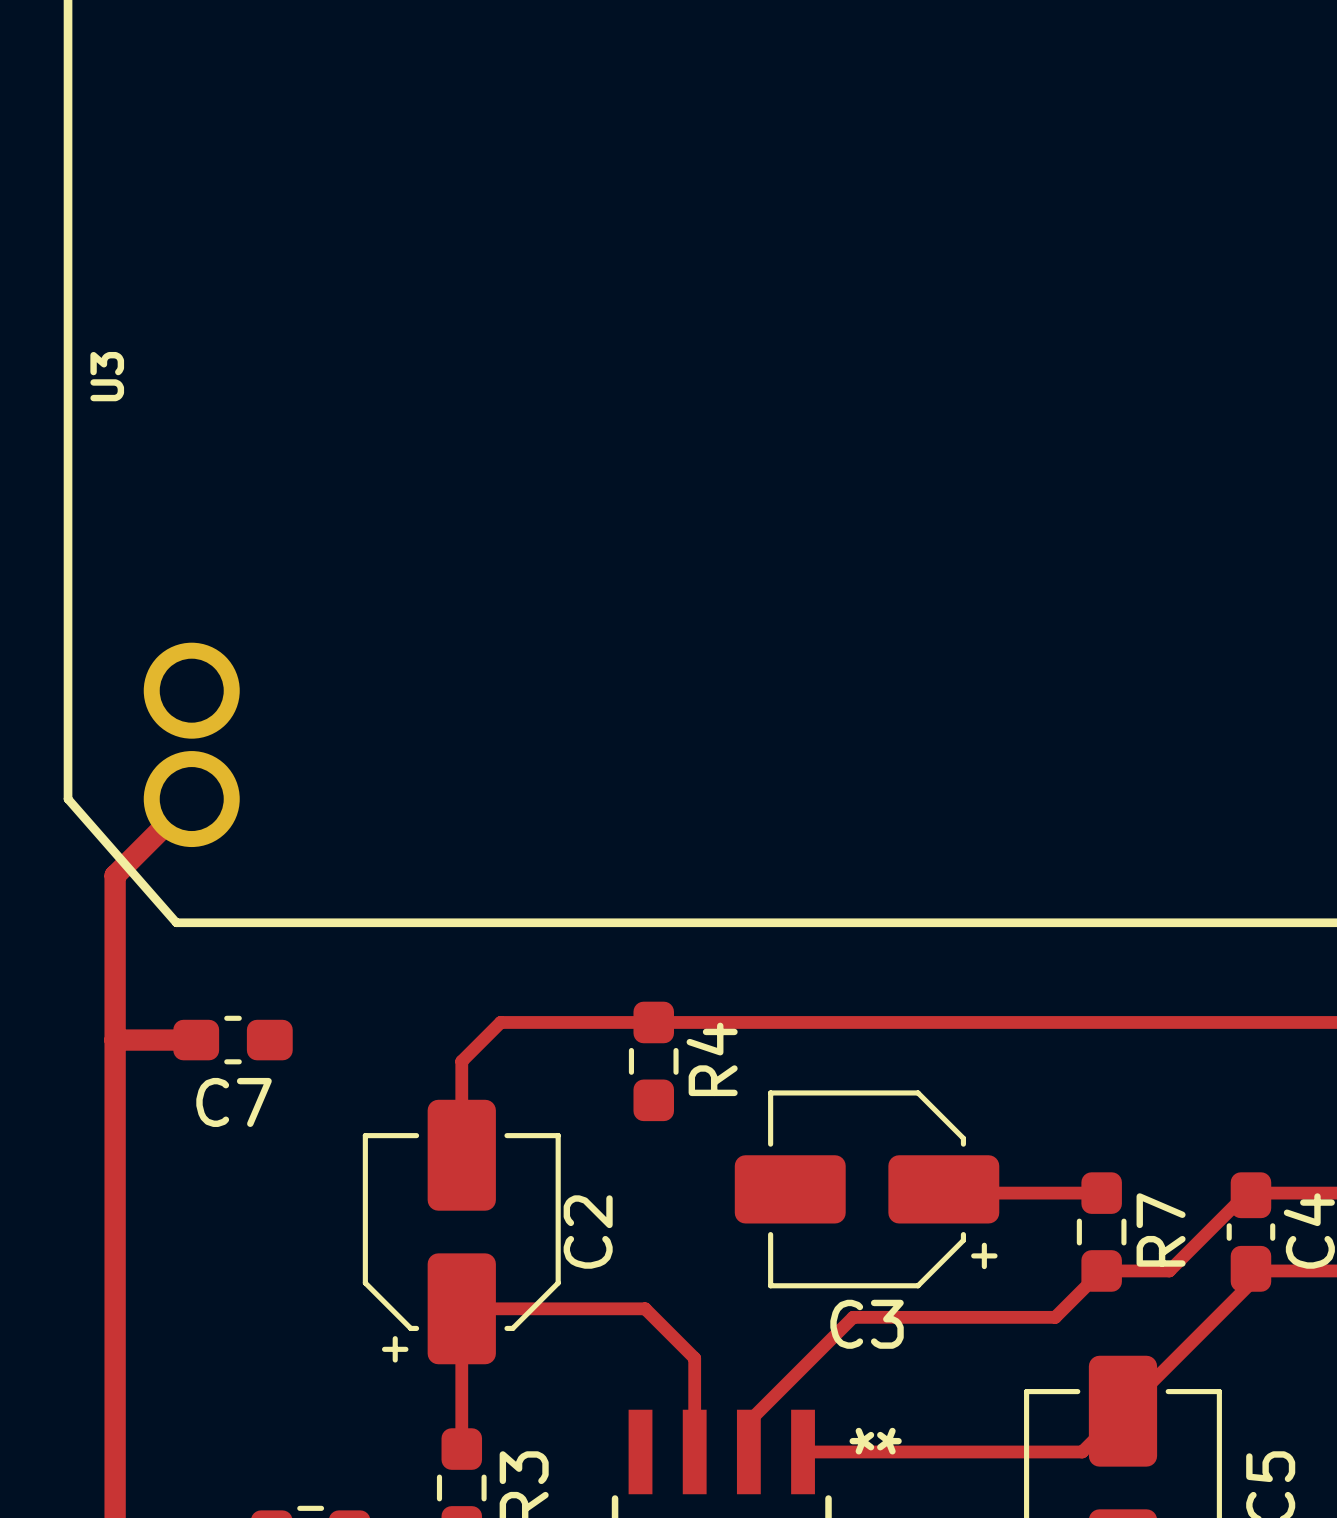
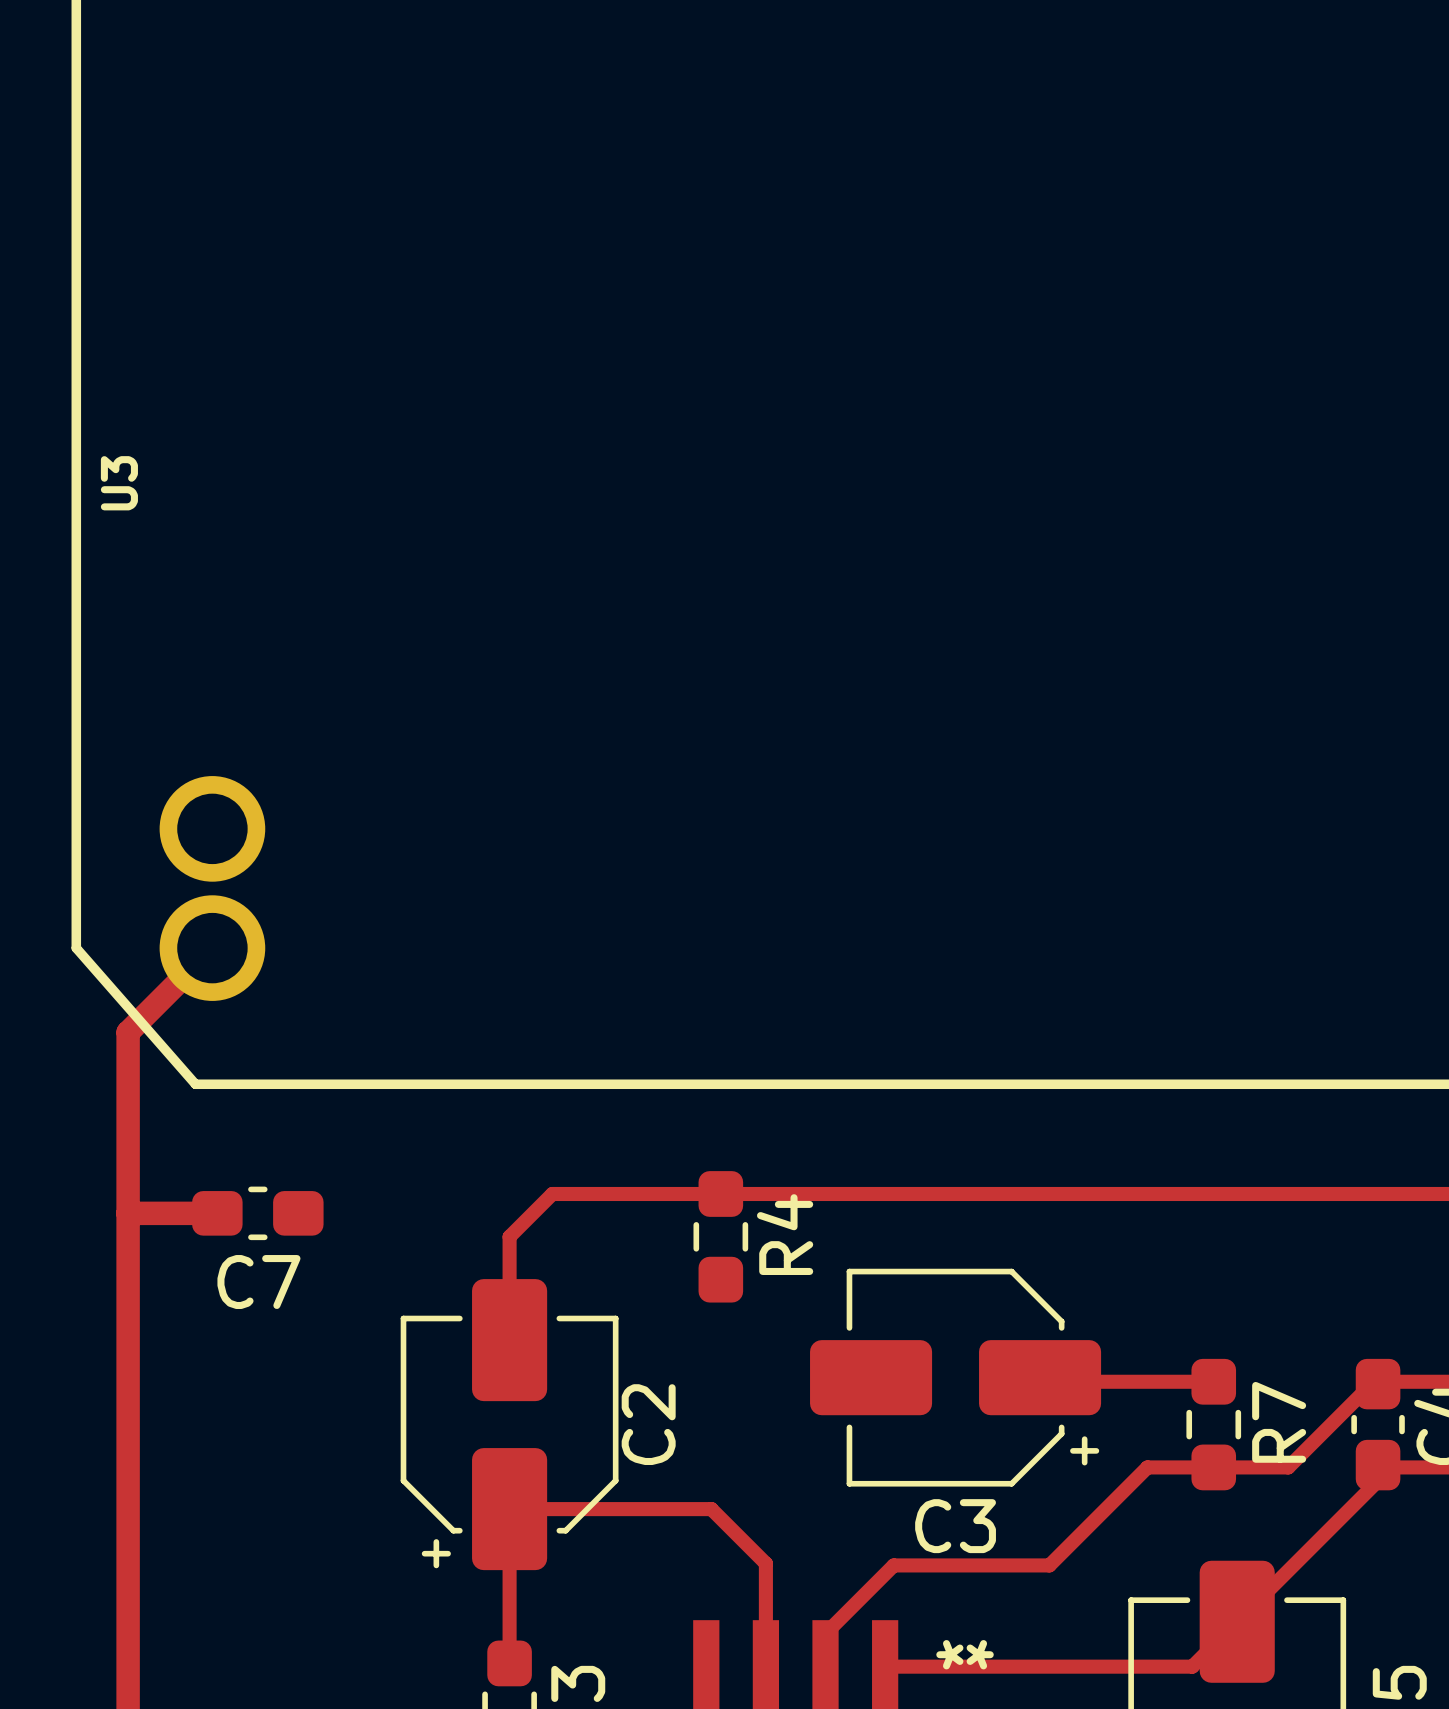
track: (1101, 1270) (1055, 1317) (853, 1317) (748, 1421) -> (1213, 1467) (1147, 1467) (1049, 1565) (893, 1565) (825, 1633)

